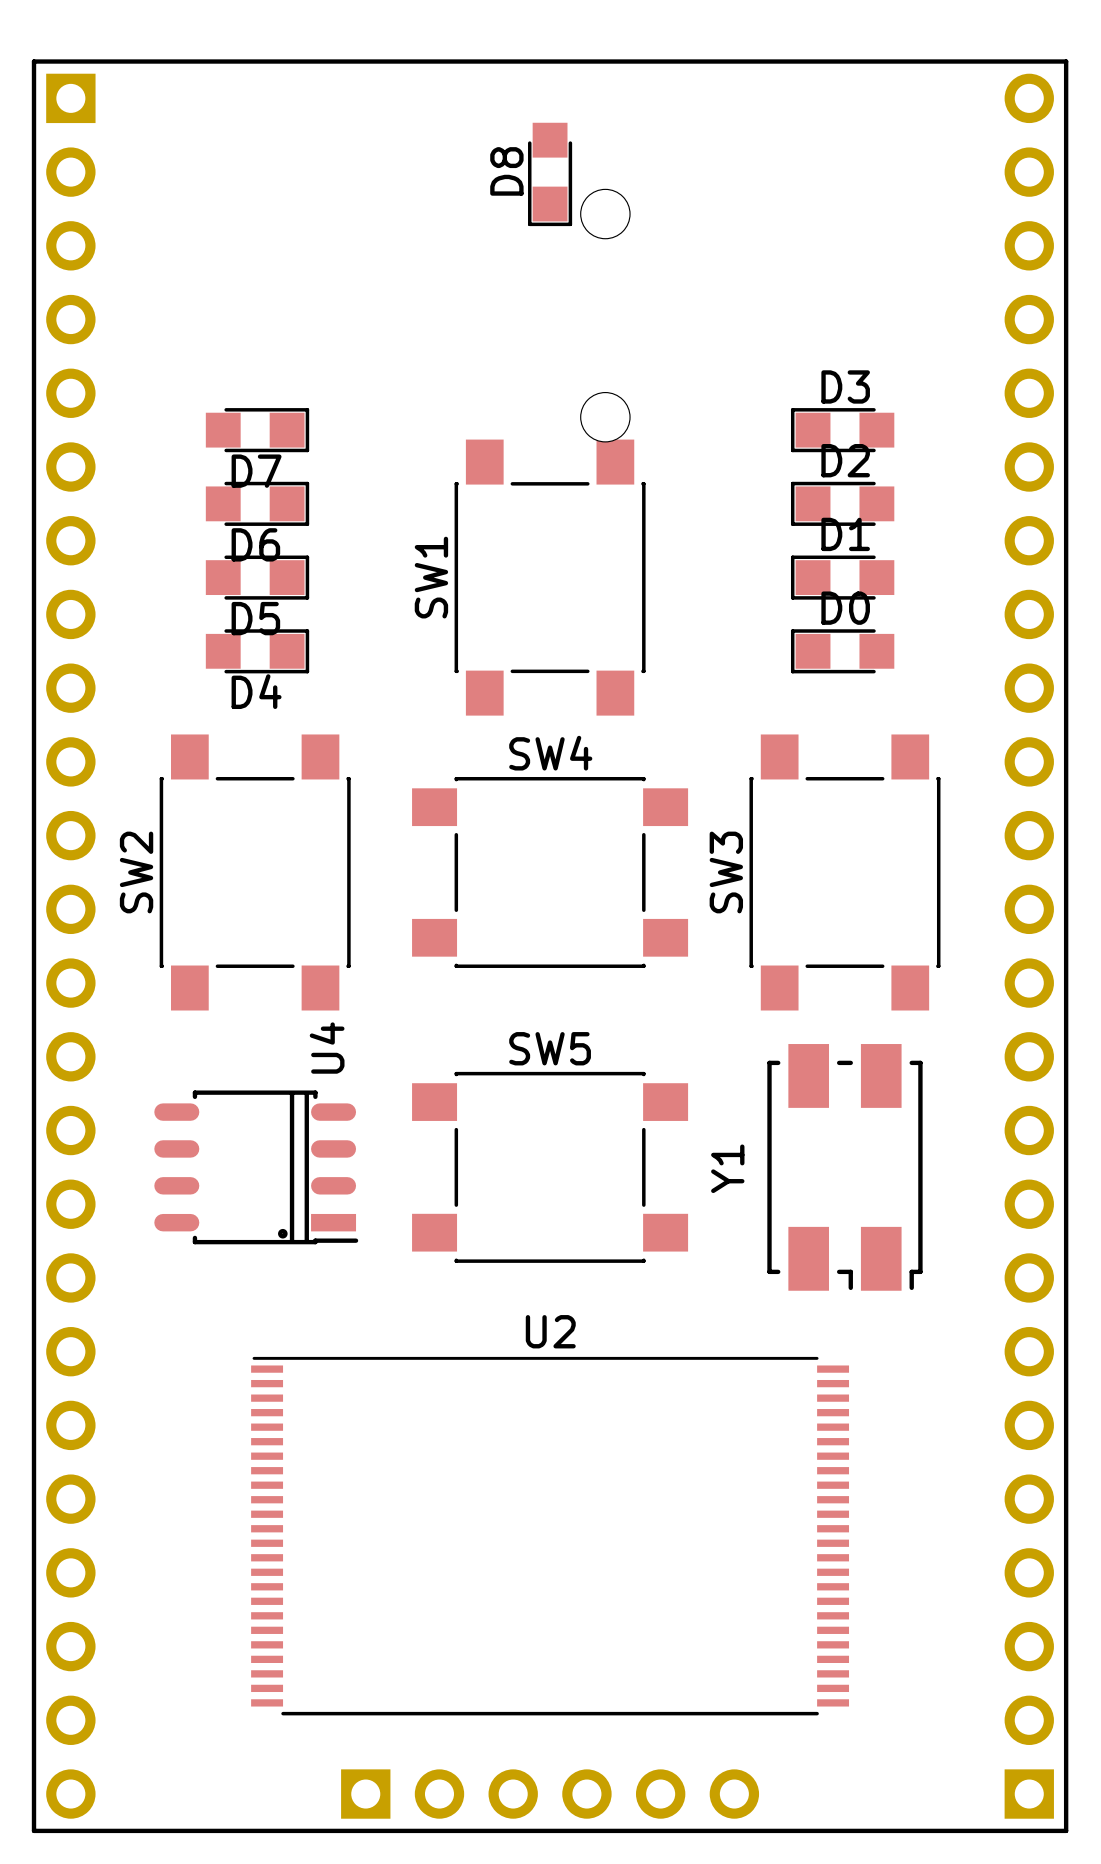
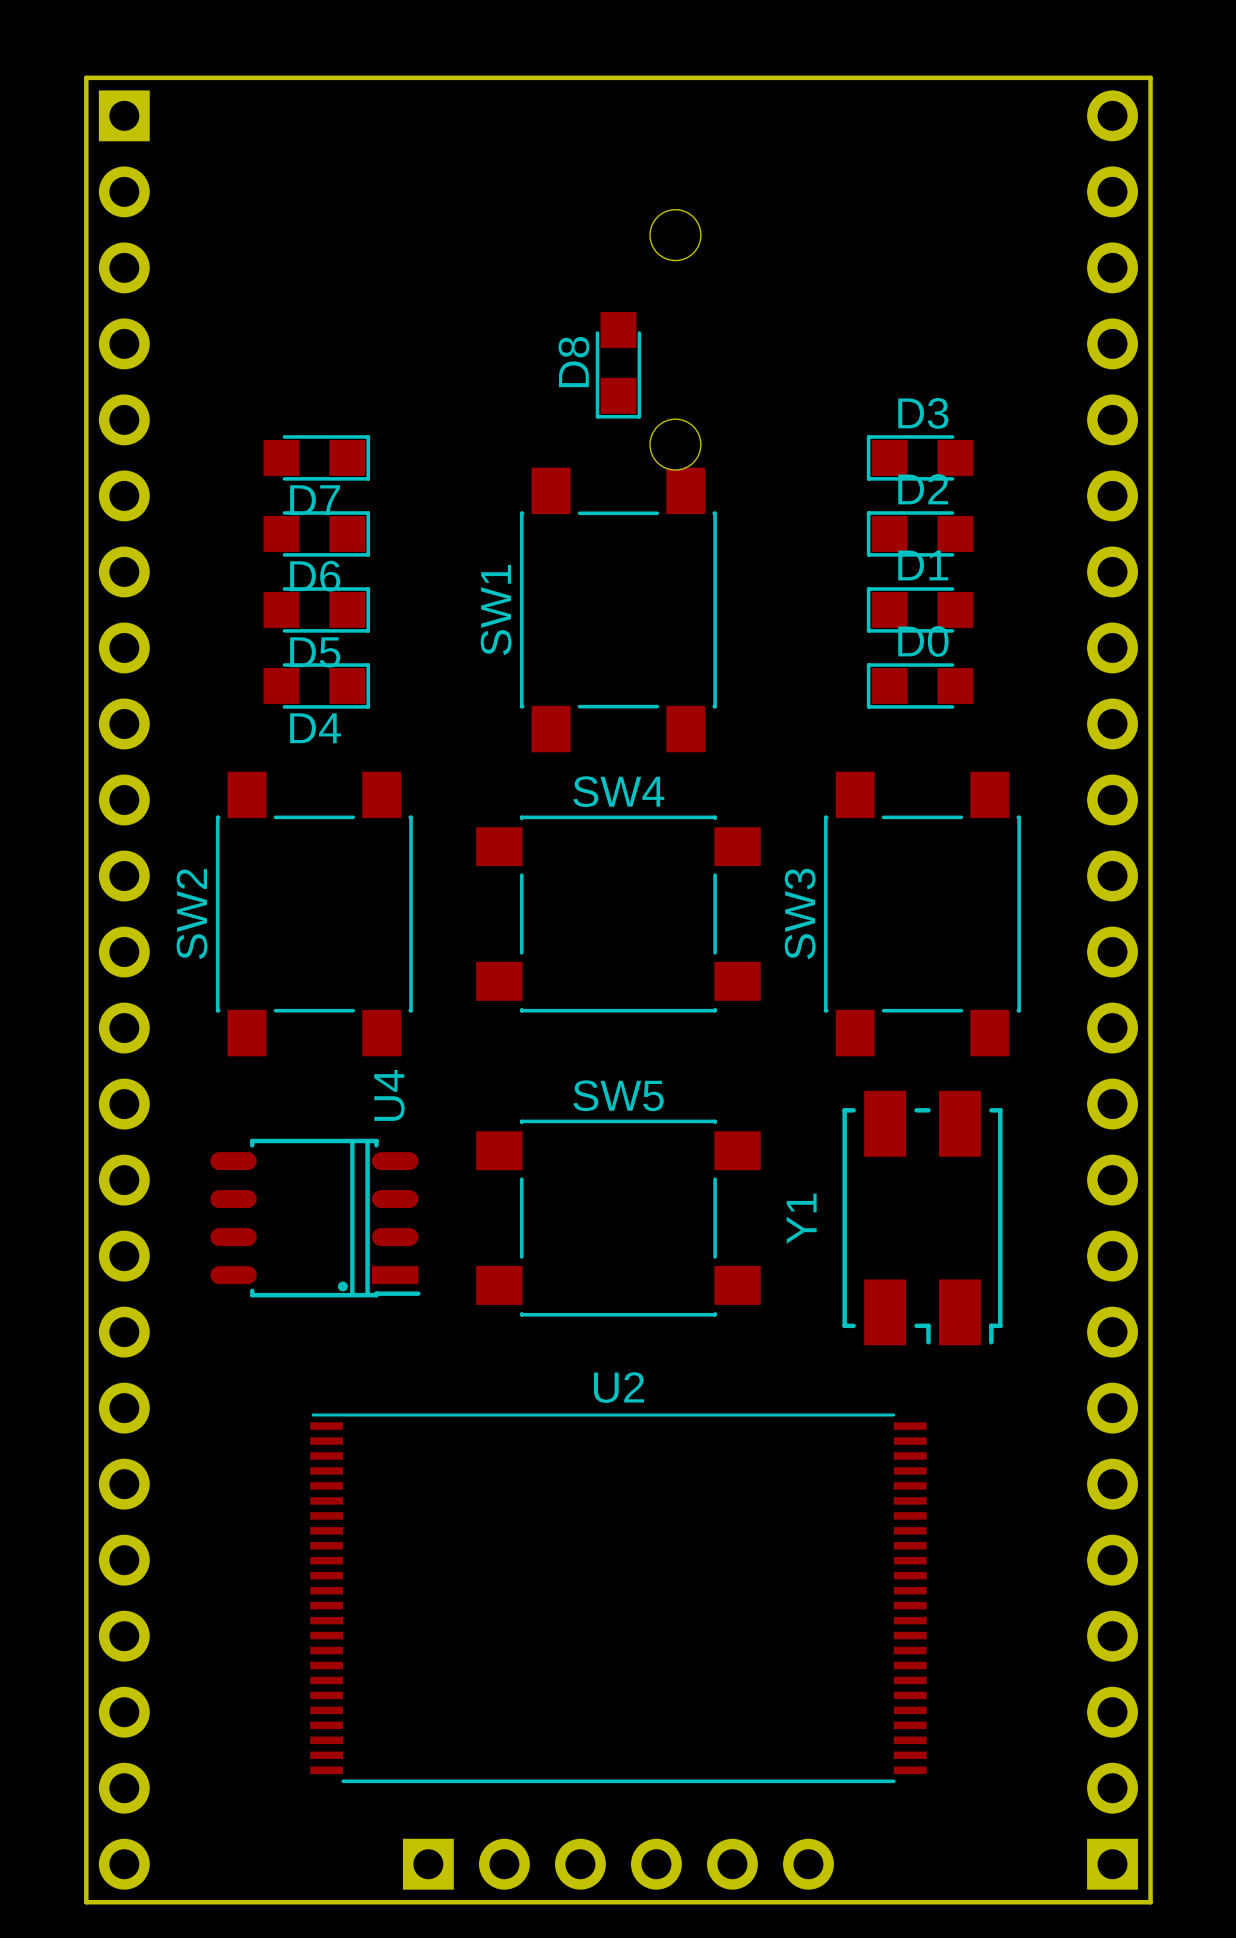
D8 position: (550, 174) -> (618, 365)

